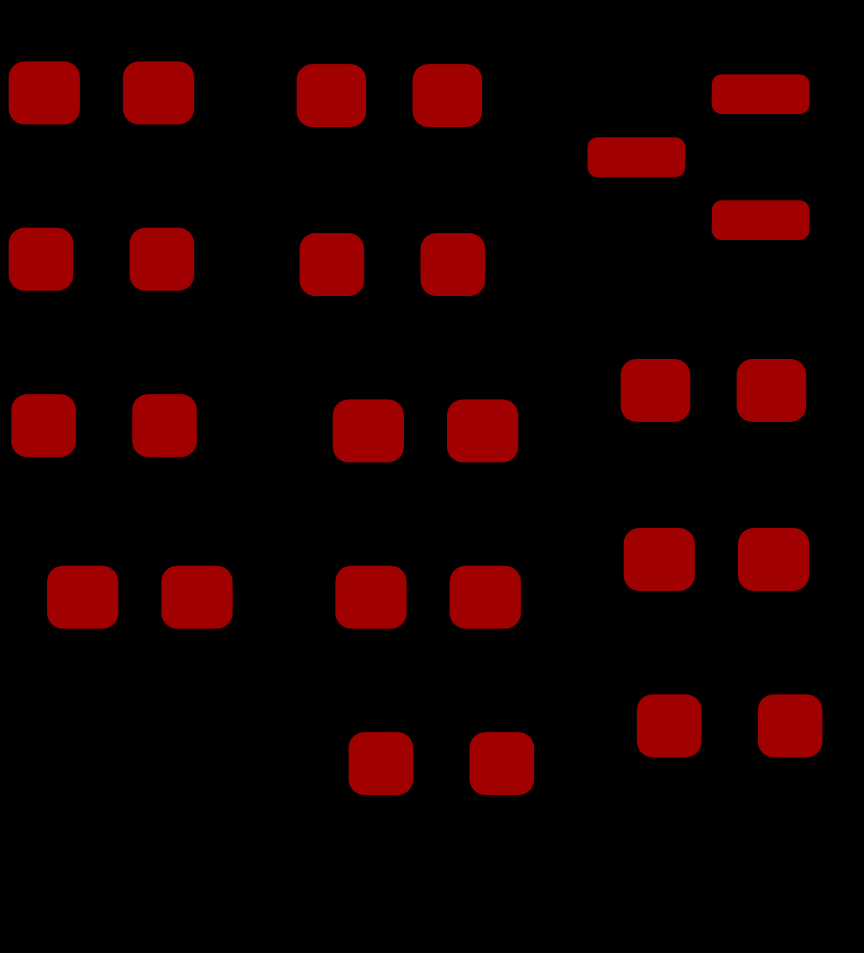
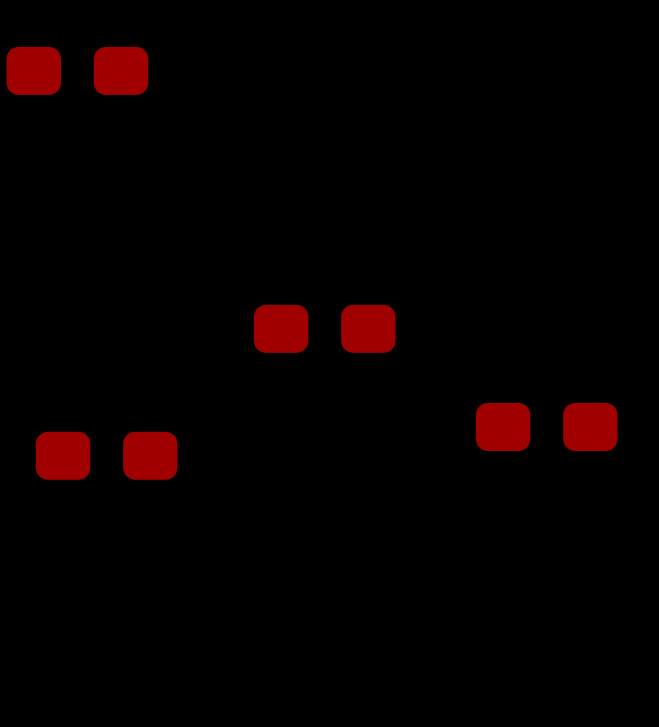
part: (389, 95) -> none
part: (698, 157) -> none
part: (101, 259) -> none
part: (392, 264) -> none
part: (713, 390) -> none
part: (104, 425) -> none
part: (428, 597) -> none
part: (729, 725) -> none
part: (441, 763) -> none

